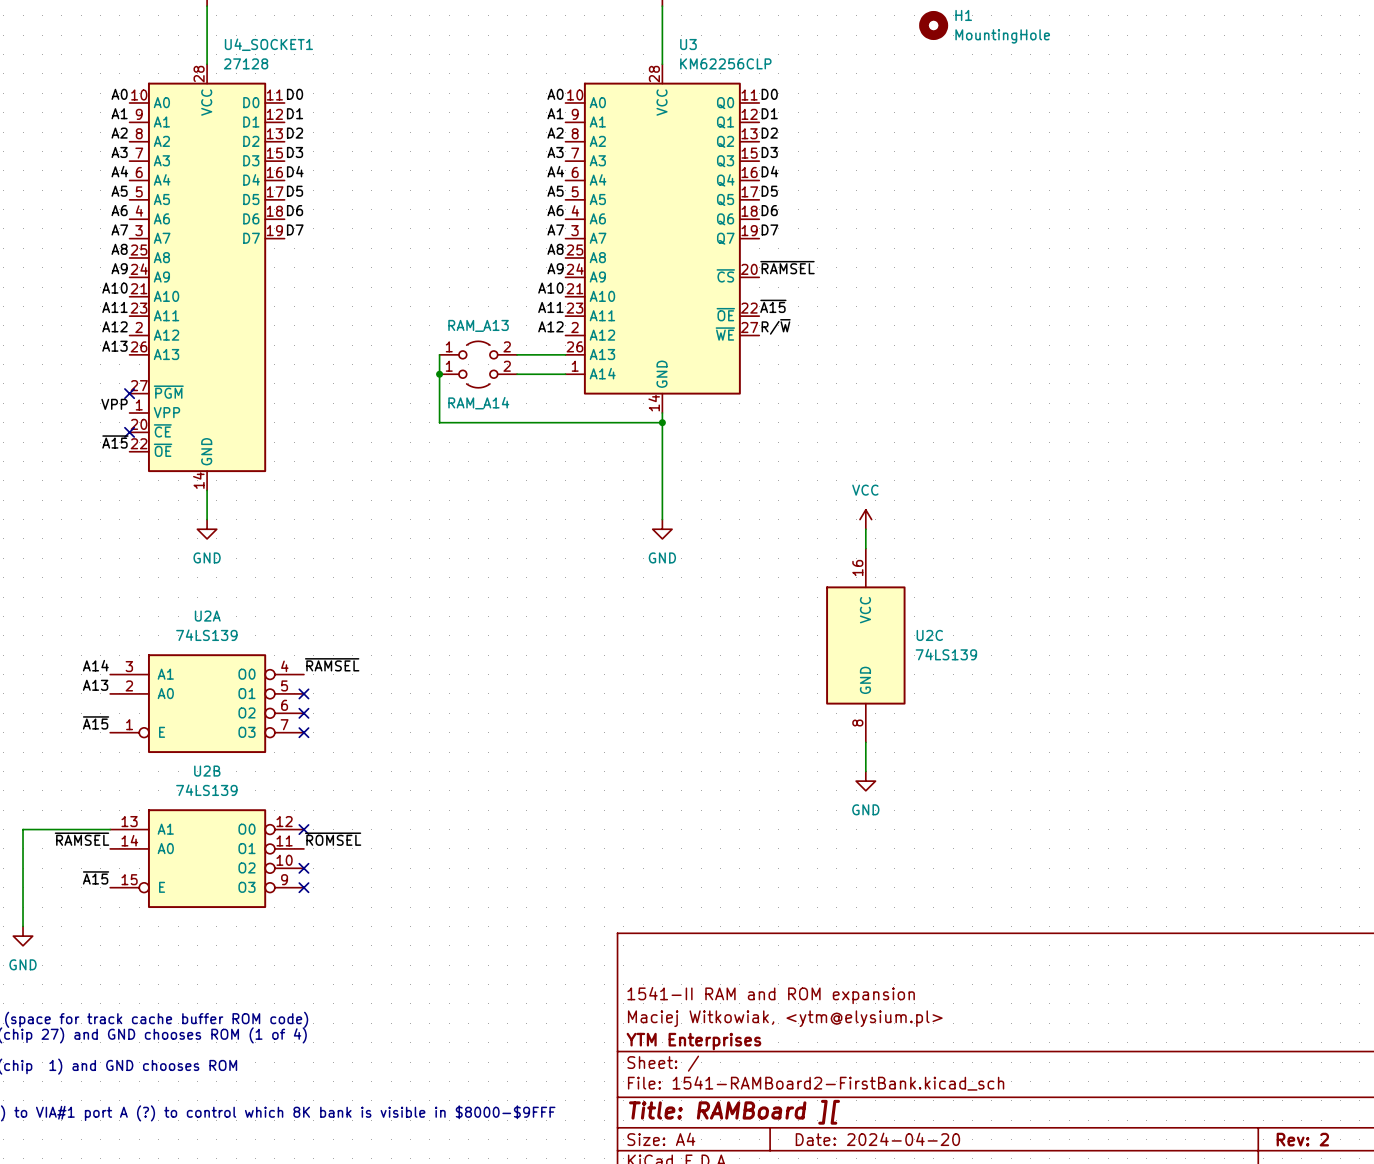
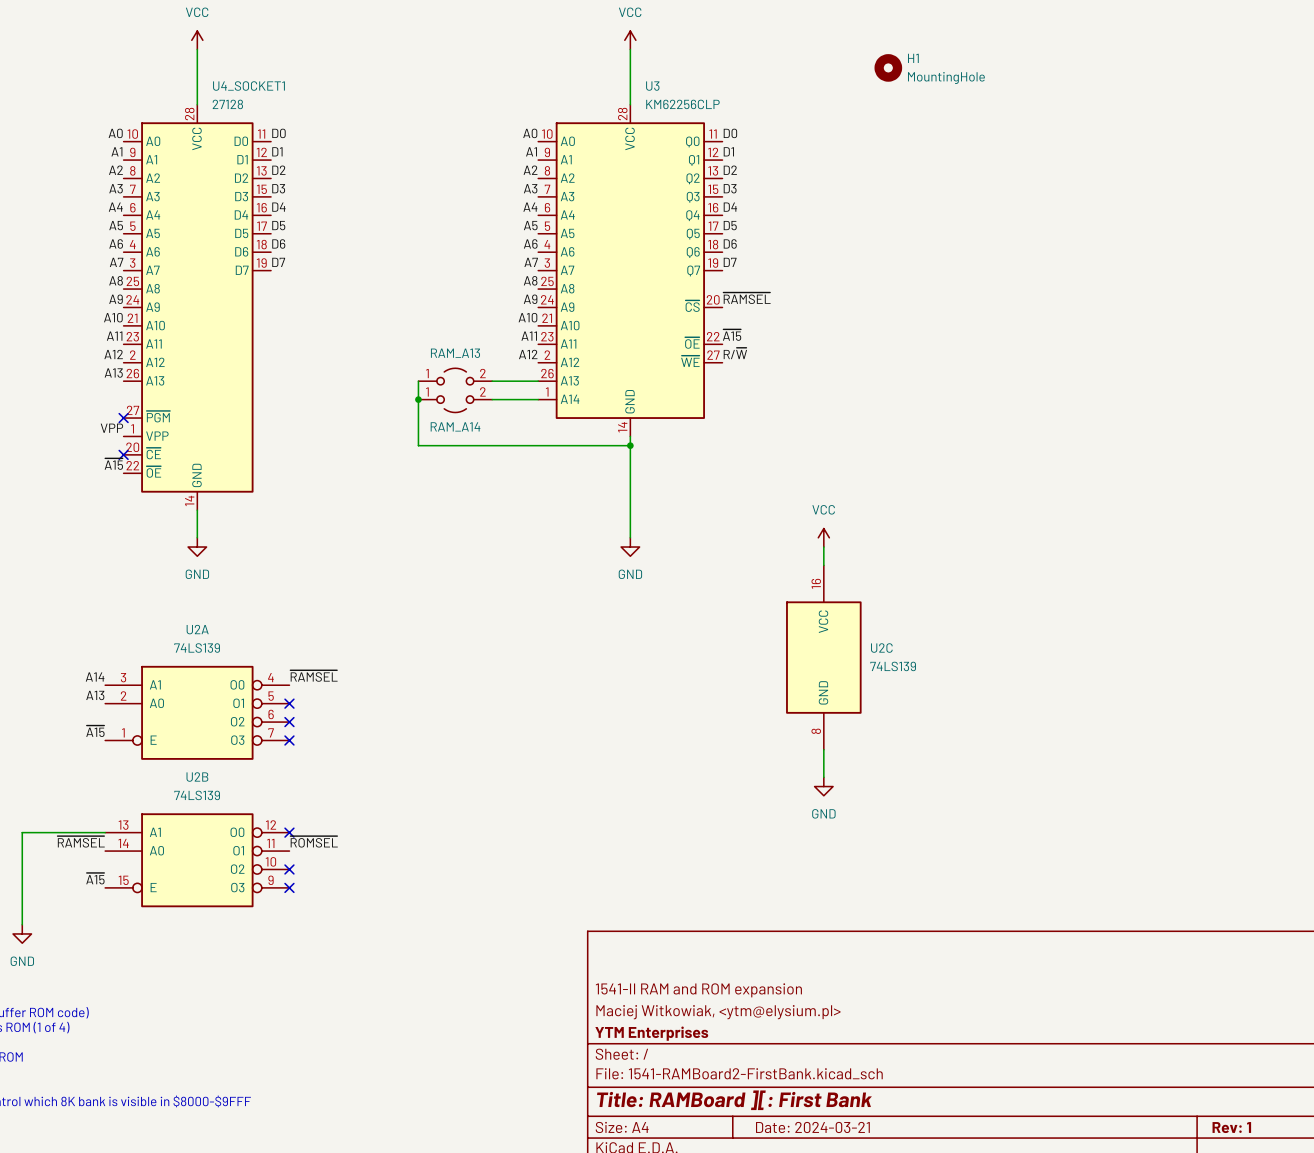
title block: Title: RAMBoard ][ (734, 1112) -> Title: RAMBoard ][: First Bank (734, 1100)
title block: Date: 2024-04-20 (877, 1139) -> Date: 2024-03-21 (812, 1127)
title block: Rev: 2 (1302, 1139) -> Rev: 1 (1231, 1127)

